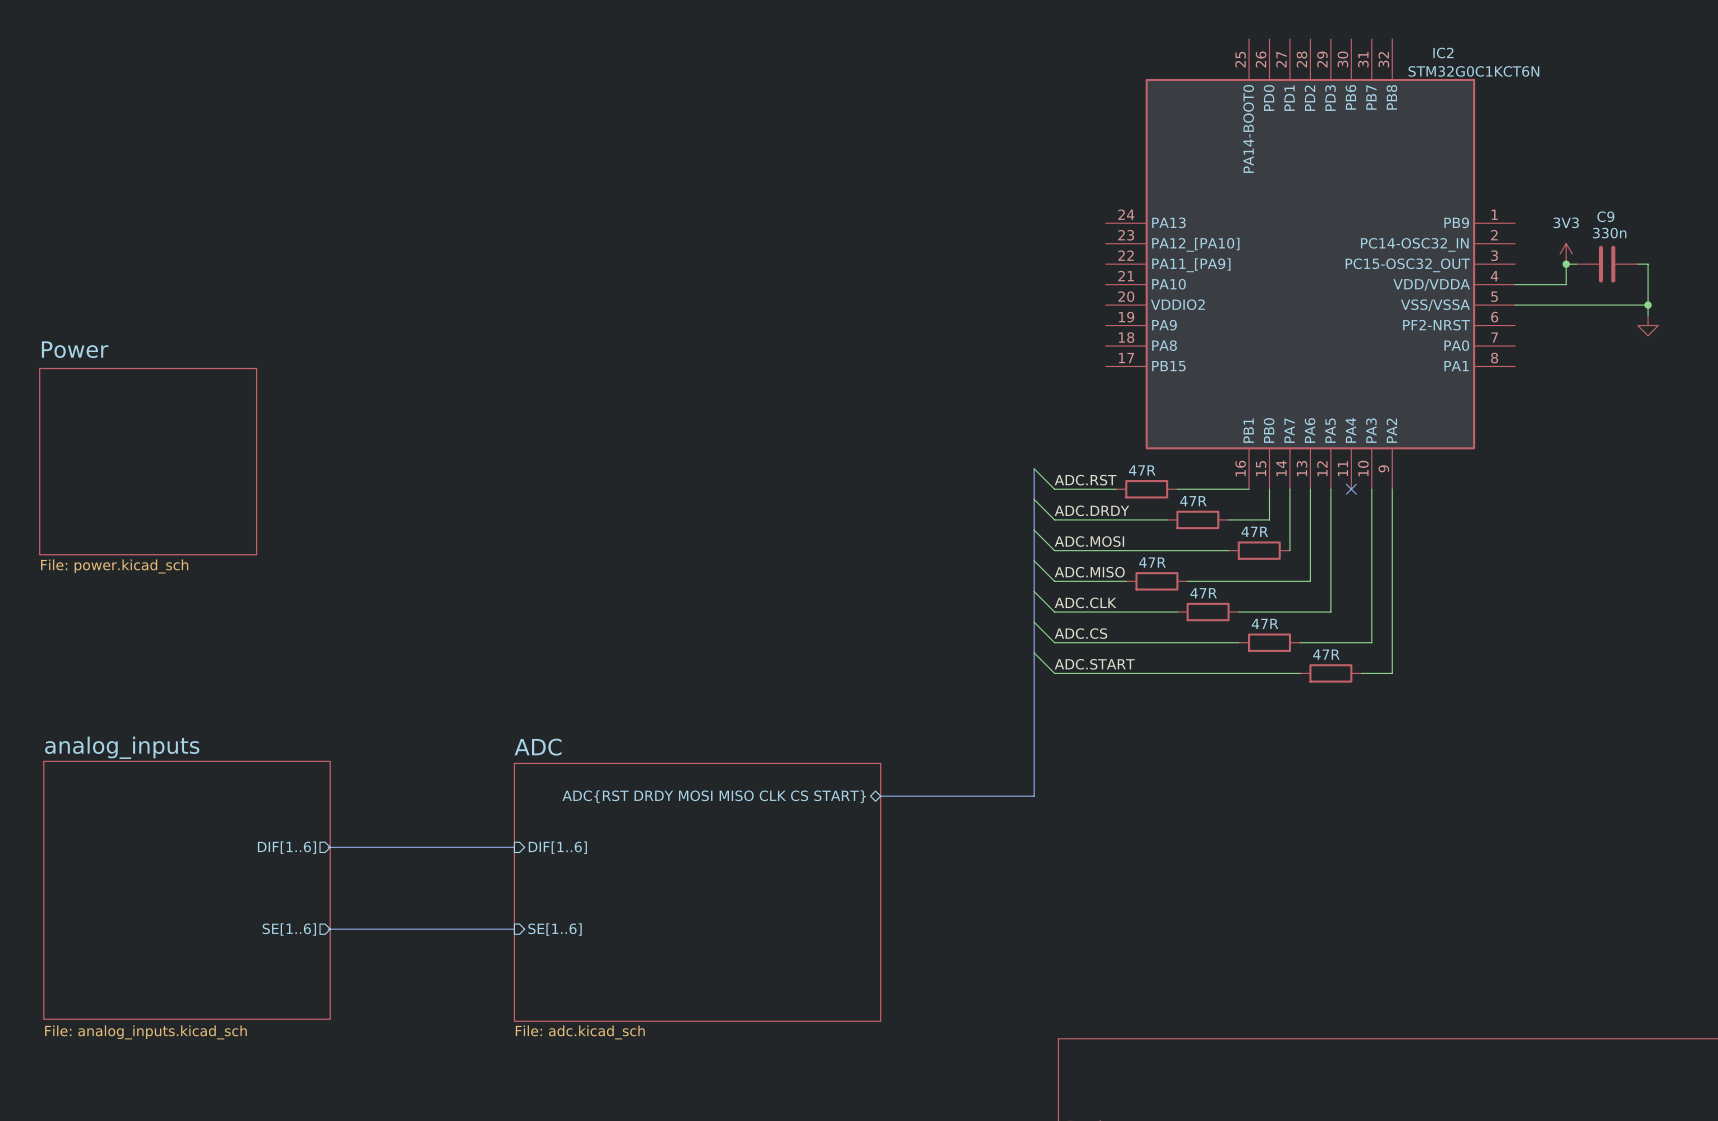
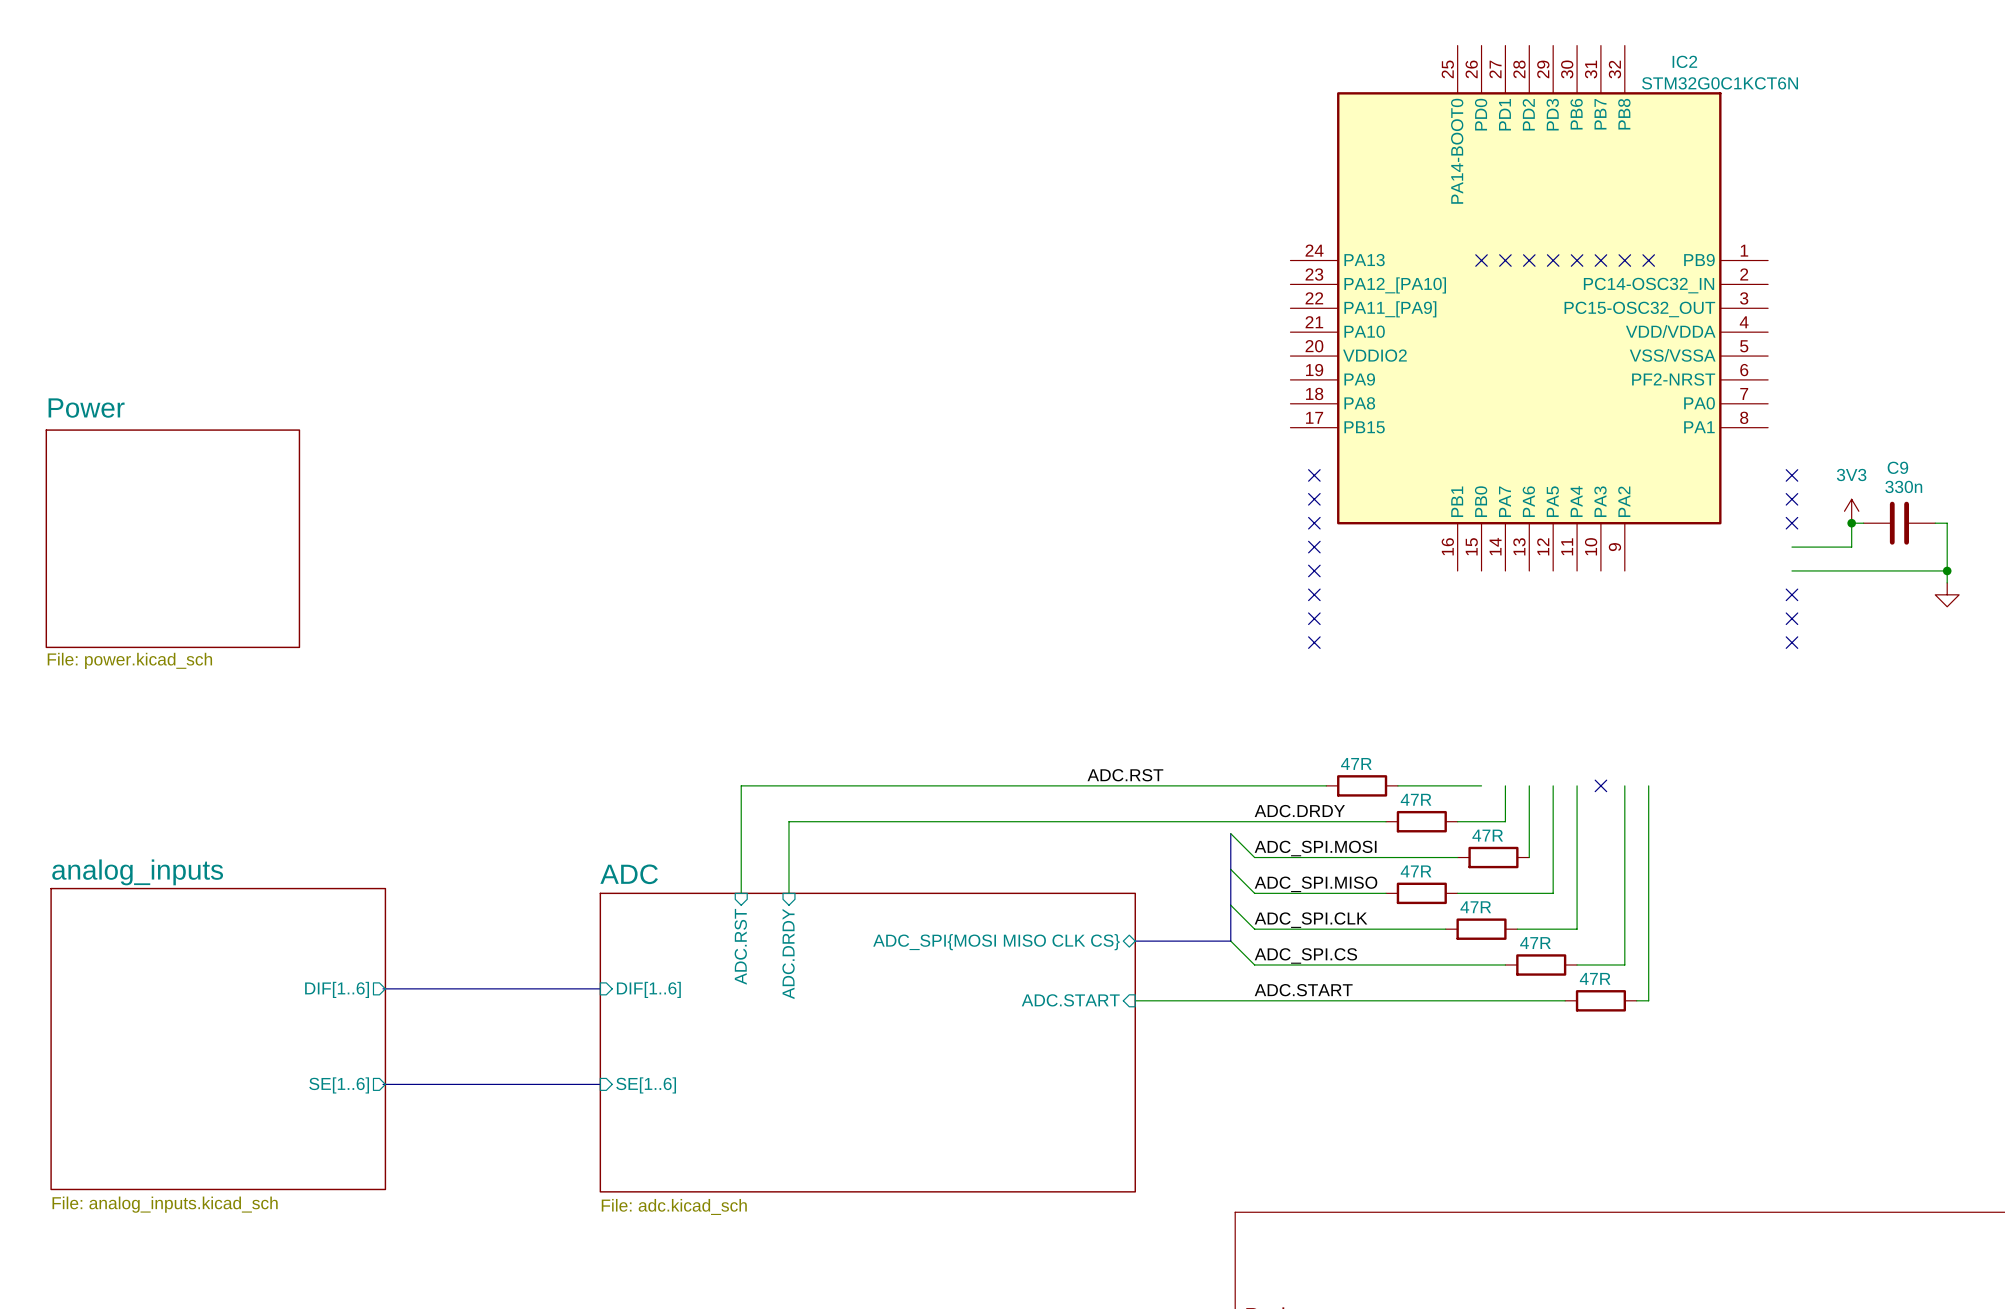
no-connect mark: none -> (1481, 260)
no-connect mark: none -> (1505, 260)
no-connect mark: none -> (1529, 260)
no-connect mark: none -> (1553, 260)
no-connect mark: none -> (1577, 260)
no-connect mark: none -> (1600, 260)
no-connect mark: none -> (1624, 260)
no-connect mark: none -> (1648, 260)
power symbol position: 3V3 (1566, 253) -> 3V3 (1851, 511)
junction: (1566, 264) -> none
wire: (1576, 264) (1566, 264) (1566, 284) (1515, 284) -> (1863, 523) (1851, 523) (1851, 547) (1791, 547)
C9 position: (1607, 264) -> (1899, 523)
wire: (1637, 264) (1648, 264) (1648, 315) -> (1935, 523) (1947, 523) (1947, 582)
wire: (1515, 305) (1648, 305) -> (1791, 570) (1947, 570)
junction: (1648, 305) -> none
power symbol position: (1648, 325) -> (1947, 594)
no-connect mark: none -> (1314, 475)
no-connect mark: none -> (1791, 475)
no-connect mark: none -> (1314, 499)
no-connect mark: none -> (1791, 499)
no-connect mark: none -> (1314, 523)
no-connect mark: none -> (1791, 523)
junction: none -> (1851, 523)
wire: (1034, 468) (1054, 489) (1116, 489) -> none
bus: (1034, 468) (1034, 796) (880, 796) -> none
no-connect mark: none -> (1314, 547)
label: ADC.RST (1085, 480) -> none
no-connect mark: none -> (1314, 570)
part: 47R (1146, 489) -> none
wire: (1177, 489) (1249, 489) -> none
wire: (1269, 489) (1269, 519) (1228, 519) -> (1505, 785) (1505, 821) (1457, 821)
wire: (1289, 489) (1289, 550) -> (1529, 785) (1529, 857)
wire: (1310, 489) (1310, 581) (1187, 581) -> none
wire: (1330, 489) (1330, 612) (1238, 612) -> none
no-connect mark: (1351, 489) -> none
wire: (1371, 489) (1371, 642) (1300, 642) -> none
wire: (1392, 489) (1392, 673) (1361, 673) -> none
junction: none -> (1947, 570)
wire: (1034, 499) (1054, 519) (1167, 519) -> none
no-connect mark: none -> (1314, 594)
no-connect mark: none -> (1791, 594)
label position: ADC.DRDY (1092, 510) -> ADC.DRDY (1299, 811)
part: 47R (1197, 519) -> none
wire: (1034, 530) (1054, 550) (1228, 550) -> (1230, 833) (1254, 857) (1457, 857)
no-connect mark: none -> (1314, 618)
no-connect mark: none -> (1791, 618)
label: ADC.MOSI (1089, 541) -> none
no-connect mark: none -> (1314, 642)
part: 47R (1259, 550) -> none
no-connect mark: none -> (1791, 642)
wire: (1034, 560) (1054, 581) (1126, 581) -> none
label: ADC.MISO (1089, 572) -> none
part: 47R (1156, 581) -> none
wire: (1034, 591) (1054, 612) (1177, 612) -> none
label: ADC.CLK (1085, 602) -> none
part: 47R (1208, 612) -> none
wire: (1034, 622) (1054, 642) (1238, 642) -> none
label: ADC.CS (1080, 633) -> none
part: 47R (1269, 642) -> none
wire: (1034, 652) (1054, 673) -> (741, 893) (741, 785) (1230, 785)
label: none -> ADC.RST (1125, 775)
label position: ADC.START (1094, 664) -> ADC.START (1303, 990)
wire: (1136, 673) (1197, 673) -> none
part: none -> 47R (1362, 785)
wire: (1269, 673) (1300, 673) -> none
wire: none -> (1553, 785) (1553, 893) (1457, 893)
part: 47R (1330, 673) -> none
wire: none -> (1577, 785) (1577, 929) (1517, 929)
no-connect mark: none -> (1600, 785)
wire: none -> (1624, 785) (1624, 964) (1577, 964)
wire: none -> (1648, 785) (1648, 1000) (1636, 1000)
wire: none -> (1386, 821) (788, 821) (788, 893)
part: none -> 47R (1421, 821)
bus: none -> (1230, 833) (1230, 941) (1135, 941)
label: none -> ADC_SPI.MOSI (1315, 848)
part: none -> 47R (1493, 857)
wire: none -> (1230, 869) (1254, 893) (1386, 893)
label: none -> ADC_SPI.MISO (1315, 884)
part: none -> 47R (1421, 893)
wire: none -> (1230, 905) (1254, 929) (1445, 929)
label: none -> ADC_SPI.CLK (1311, 920)
sheet pin: ADC{RST DRDY MOSI MISO CLK CS START} (714, 796) -> ADC_SPI{MOSI MISO CLK CS} (996, 942)
part: none -> 47R (1481, 929)
wire: none -> (1230, 941) (1254, 964) (1505, 964)
sheet pin: none -> ADC.RST (740, 946)
sheet pin: none -> ADC.DRDY (788, 954)
label: none -> ADC_SPI.CS (1305, 955)
part: none -> 47R (1541, 964)
sheet pin: none -> ADC.START (1070, 1000)
wire: none -> (1135, 1000) (1565, 1000)
part: none -> 47R (1600, 1000)
sheet ADC: File: adc.kicad_sch (697, 892) -> none
sheet ADC: none -> File: adc.kicad_sch (867, 1042)

